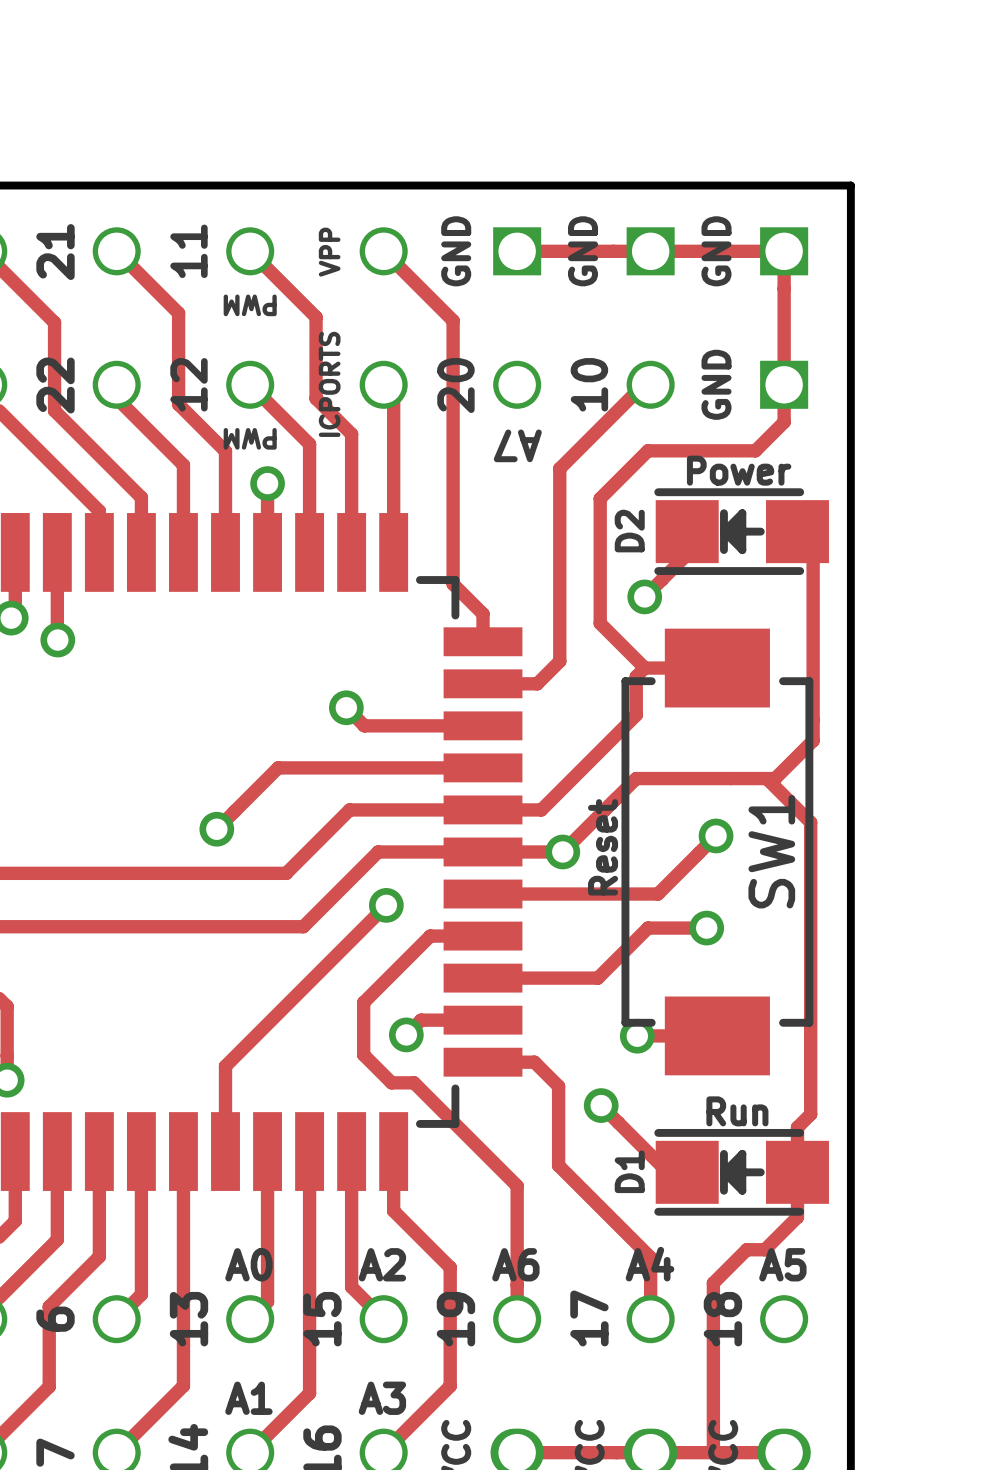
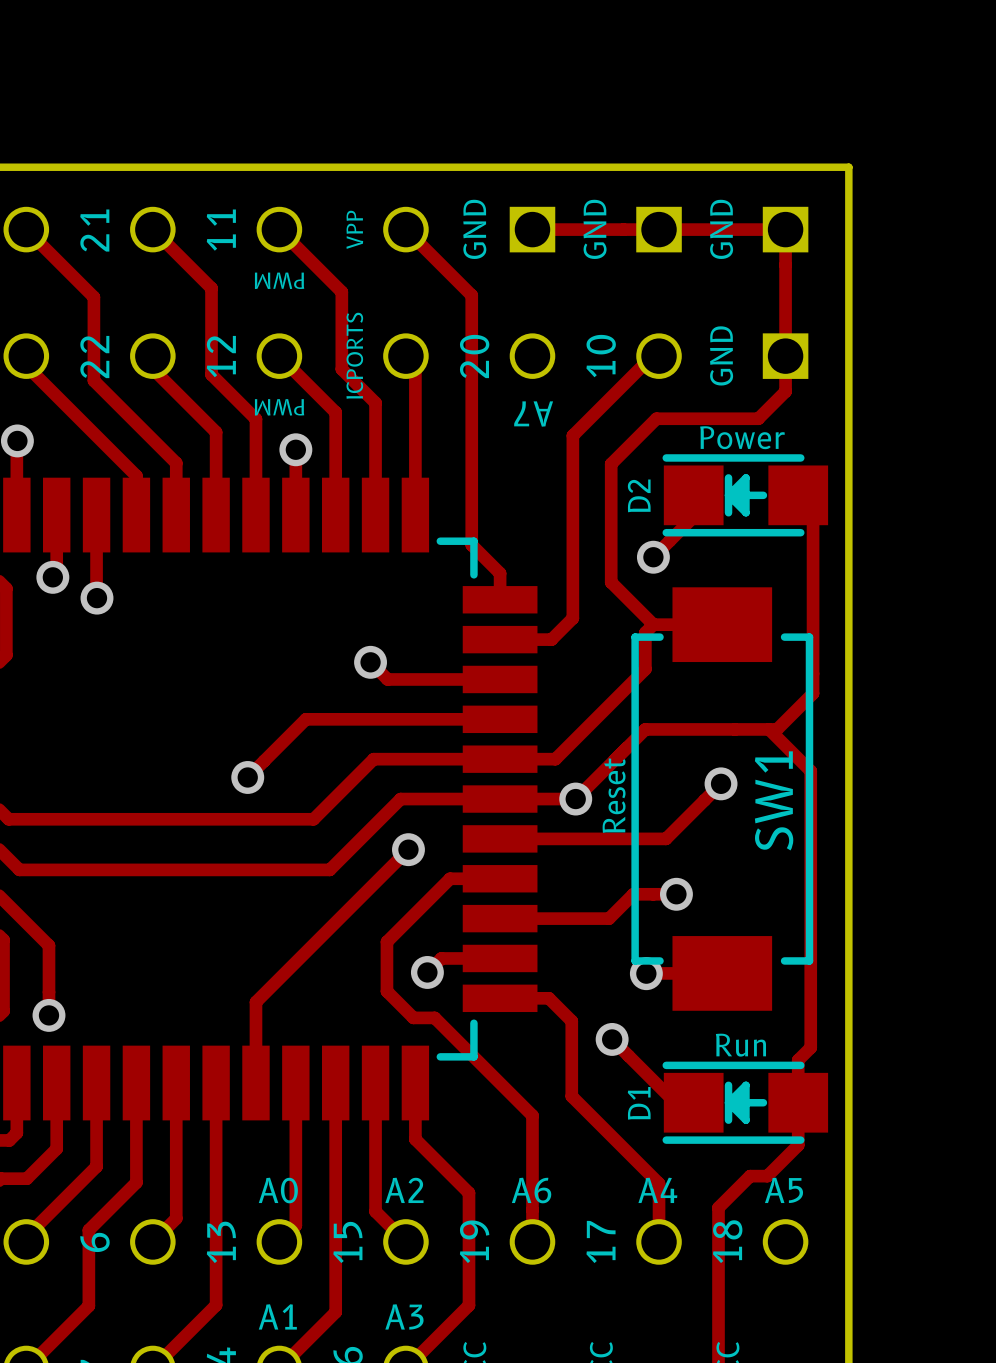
track: (706, 928) (647, 928) (623, 952) -> (676, 894) (633, 894)
via position: (706, 928) -> (676, 894)

